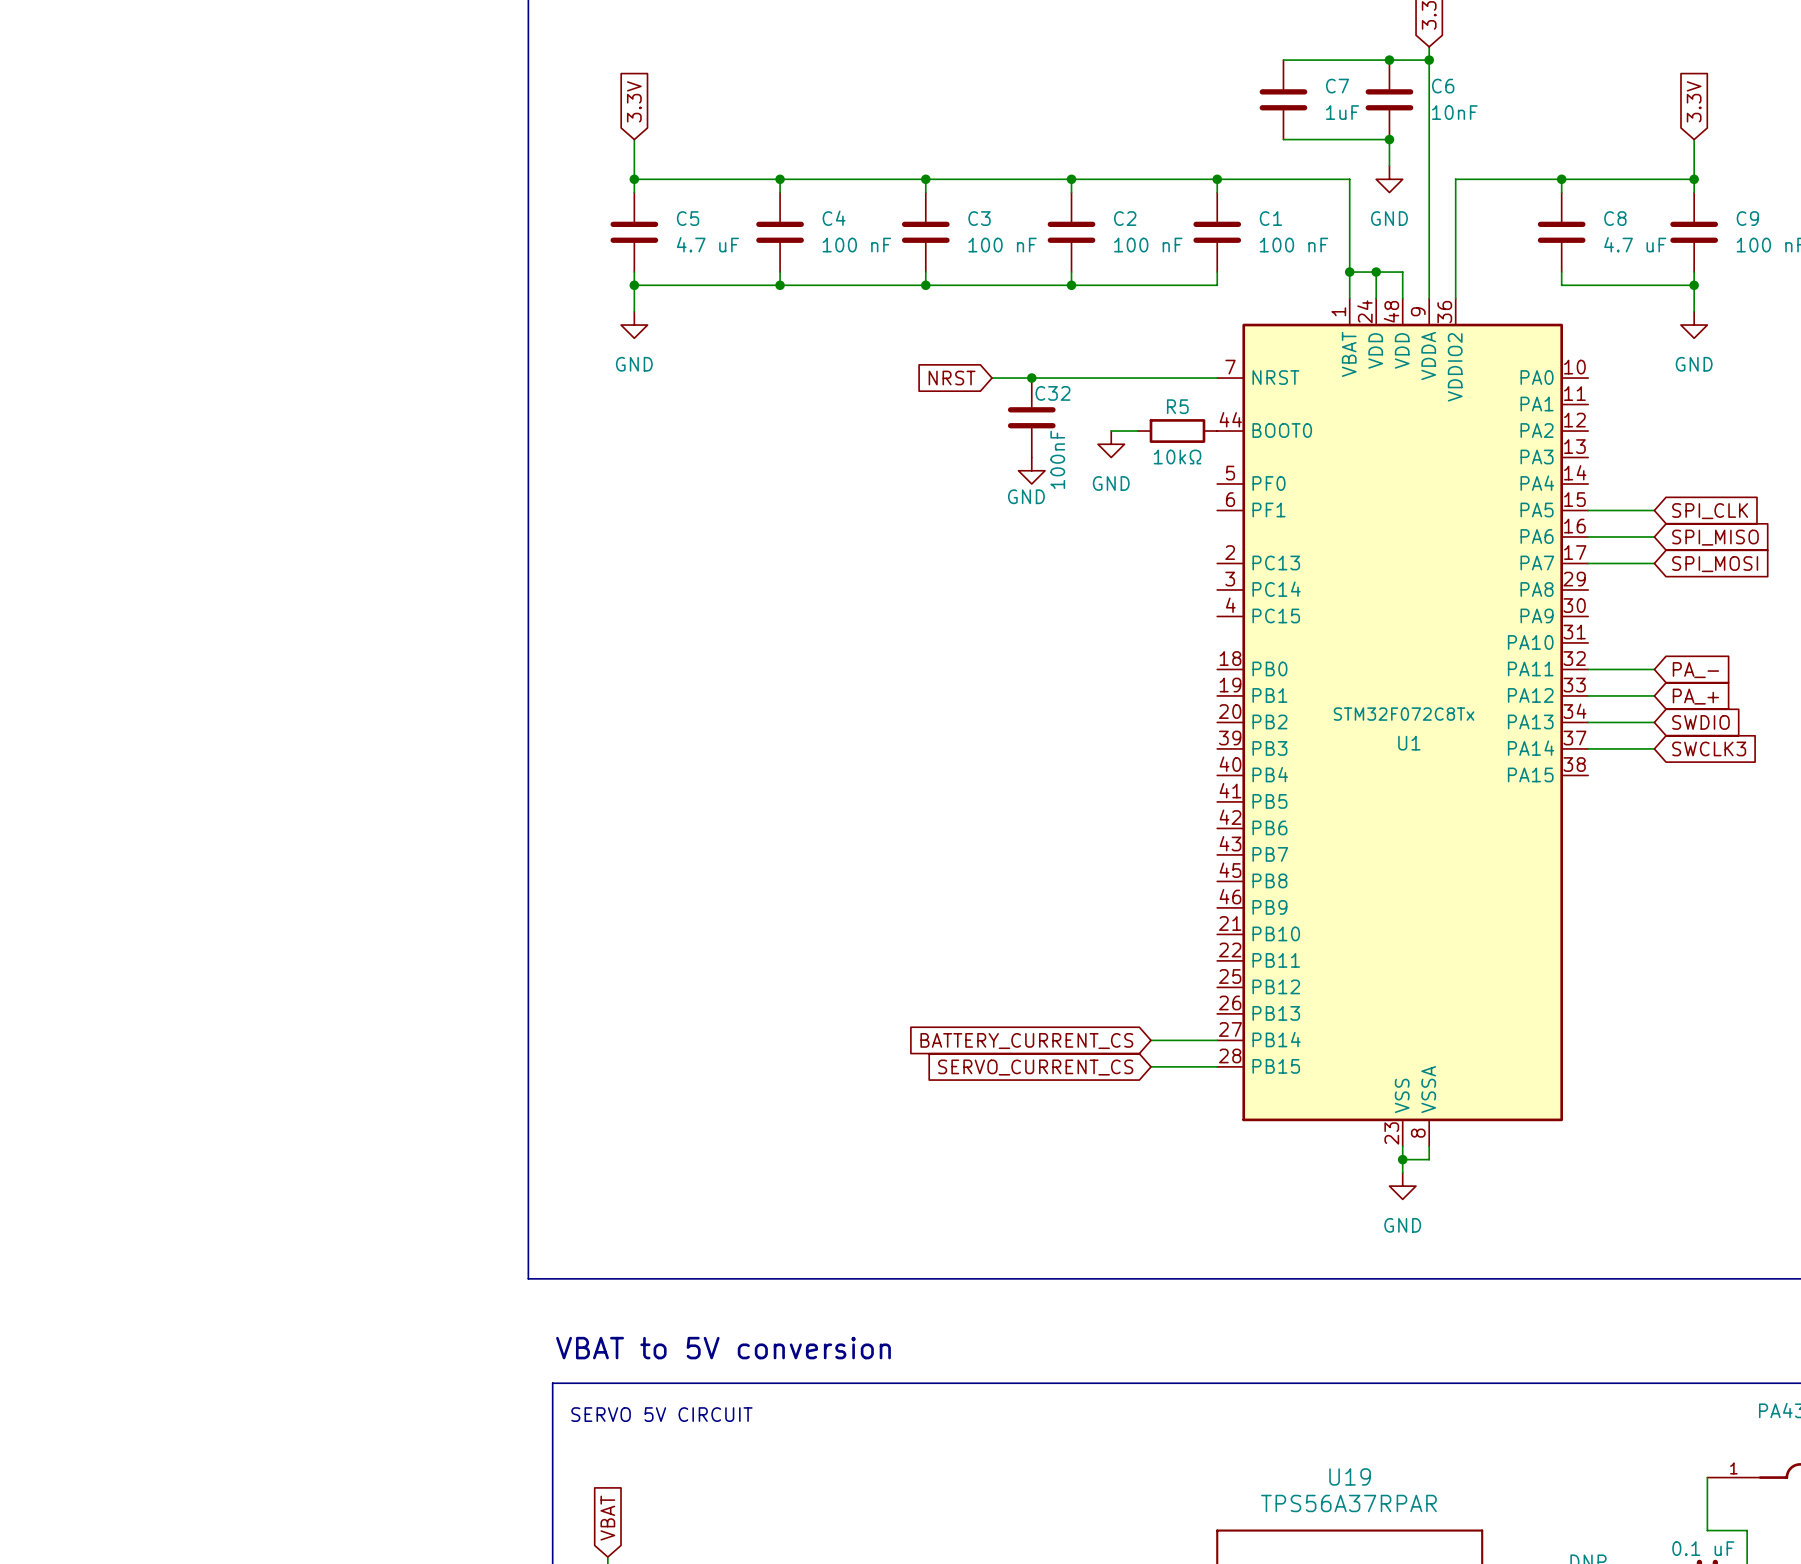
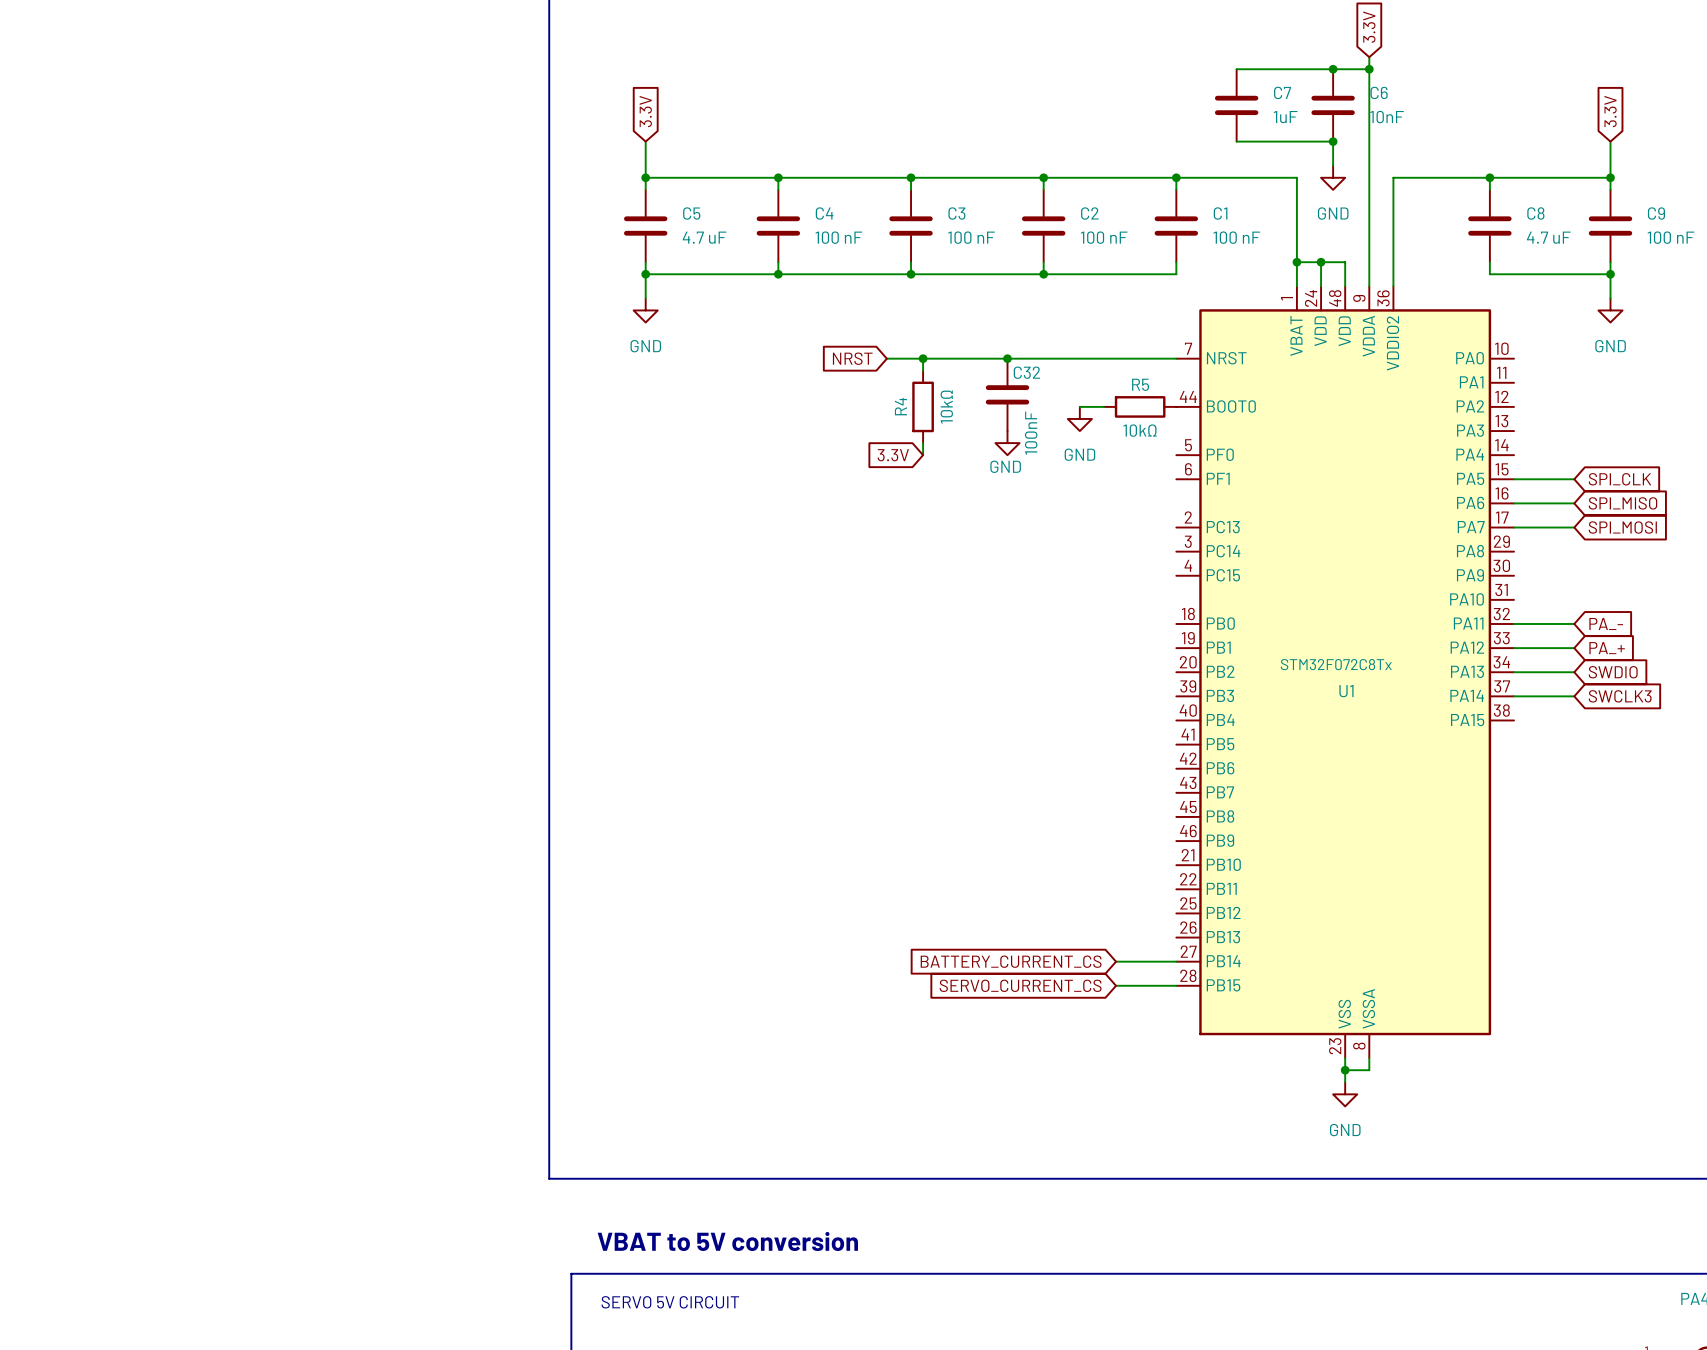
wire: none -> (886, 358) (971, 358)
wire: none -> (923, 358) (923, 370)
junction: none -> (923, 358)
global label position: NRST (952, 378) -> NRST (852, 358)
R4: none -> 10kΩ (923, 406)
wire: none -> (923, 443) (923, 455)
global label: none -> 3.3V (893, 455)

